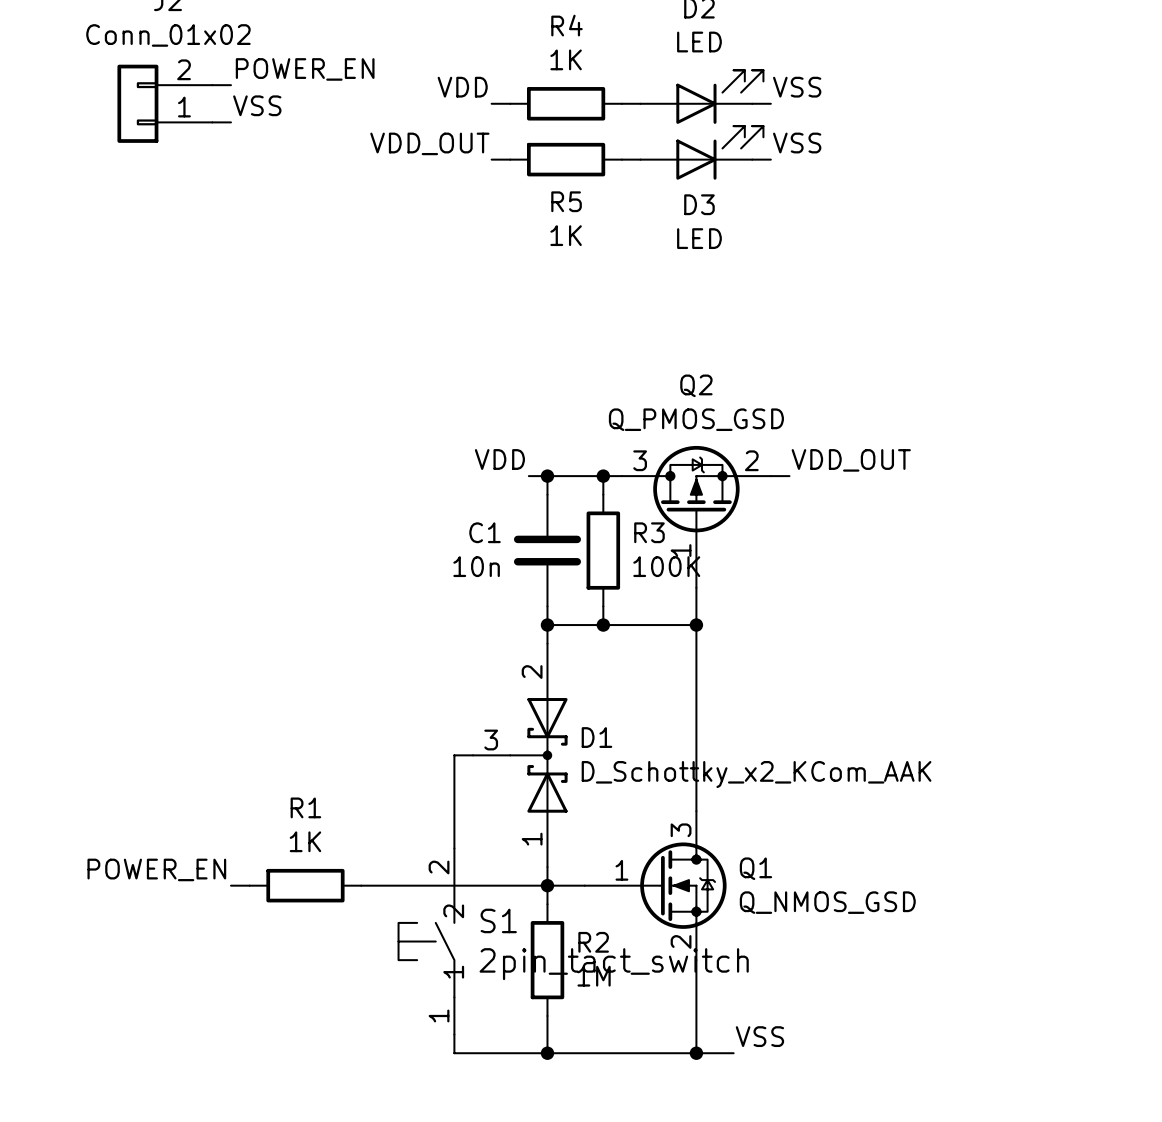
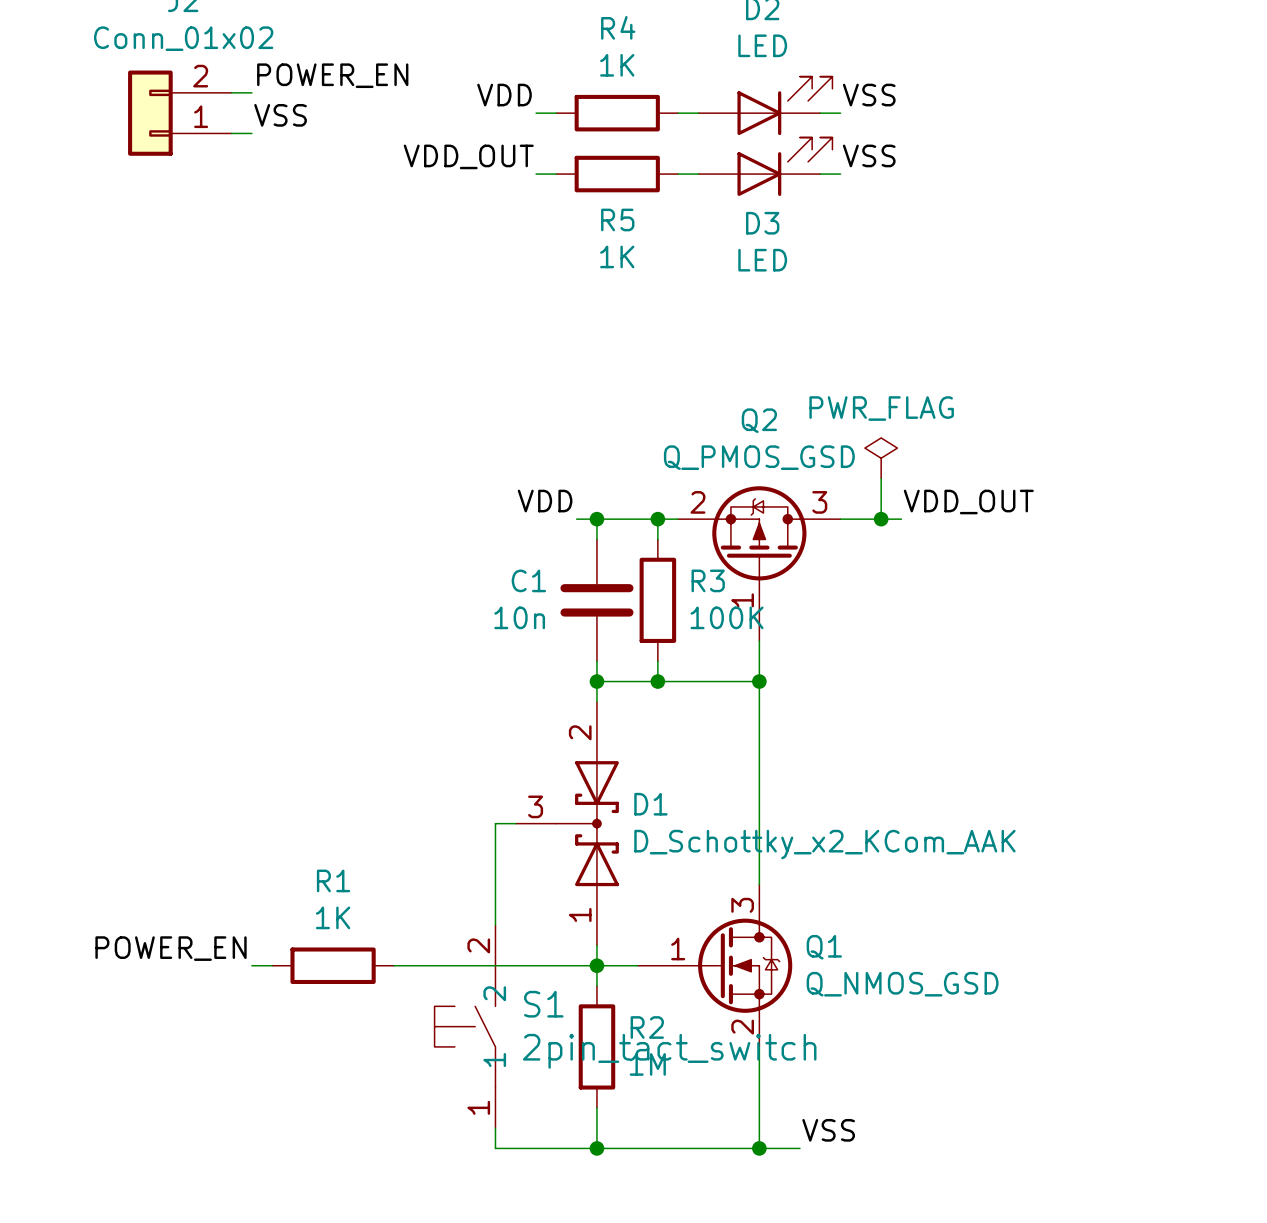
power symbol: none -> PWR_FLAG (881, 458)
wire: none -> (881, 478) (881, 519)
label position: VDD_OUT (851, 460) -> VDD_OUT (968, 502)
wire: none -> (860, 519) (901, 519)
junction: none -> (881, 519)
Q2 flip: as is (696, 489) -> left-right (759, 533)

